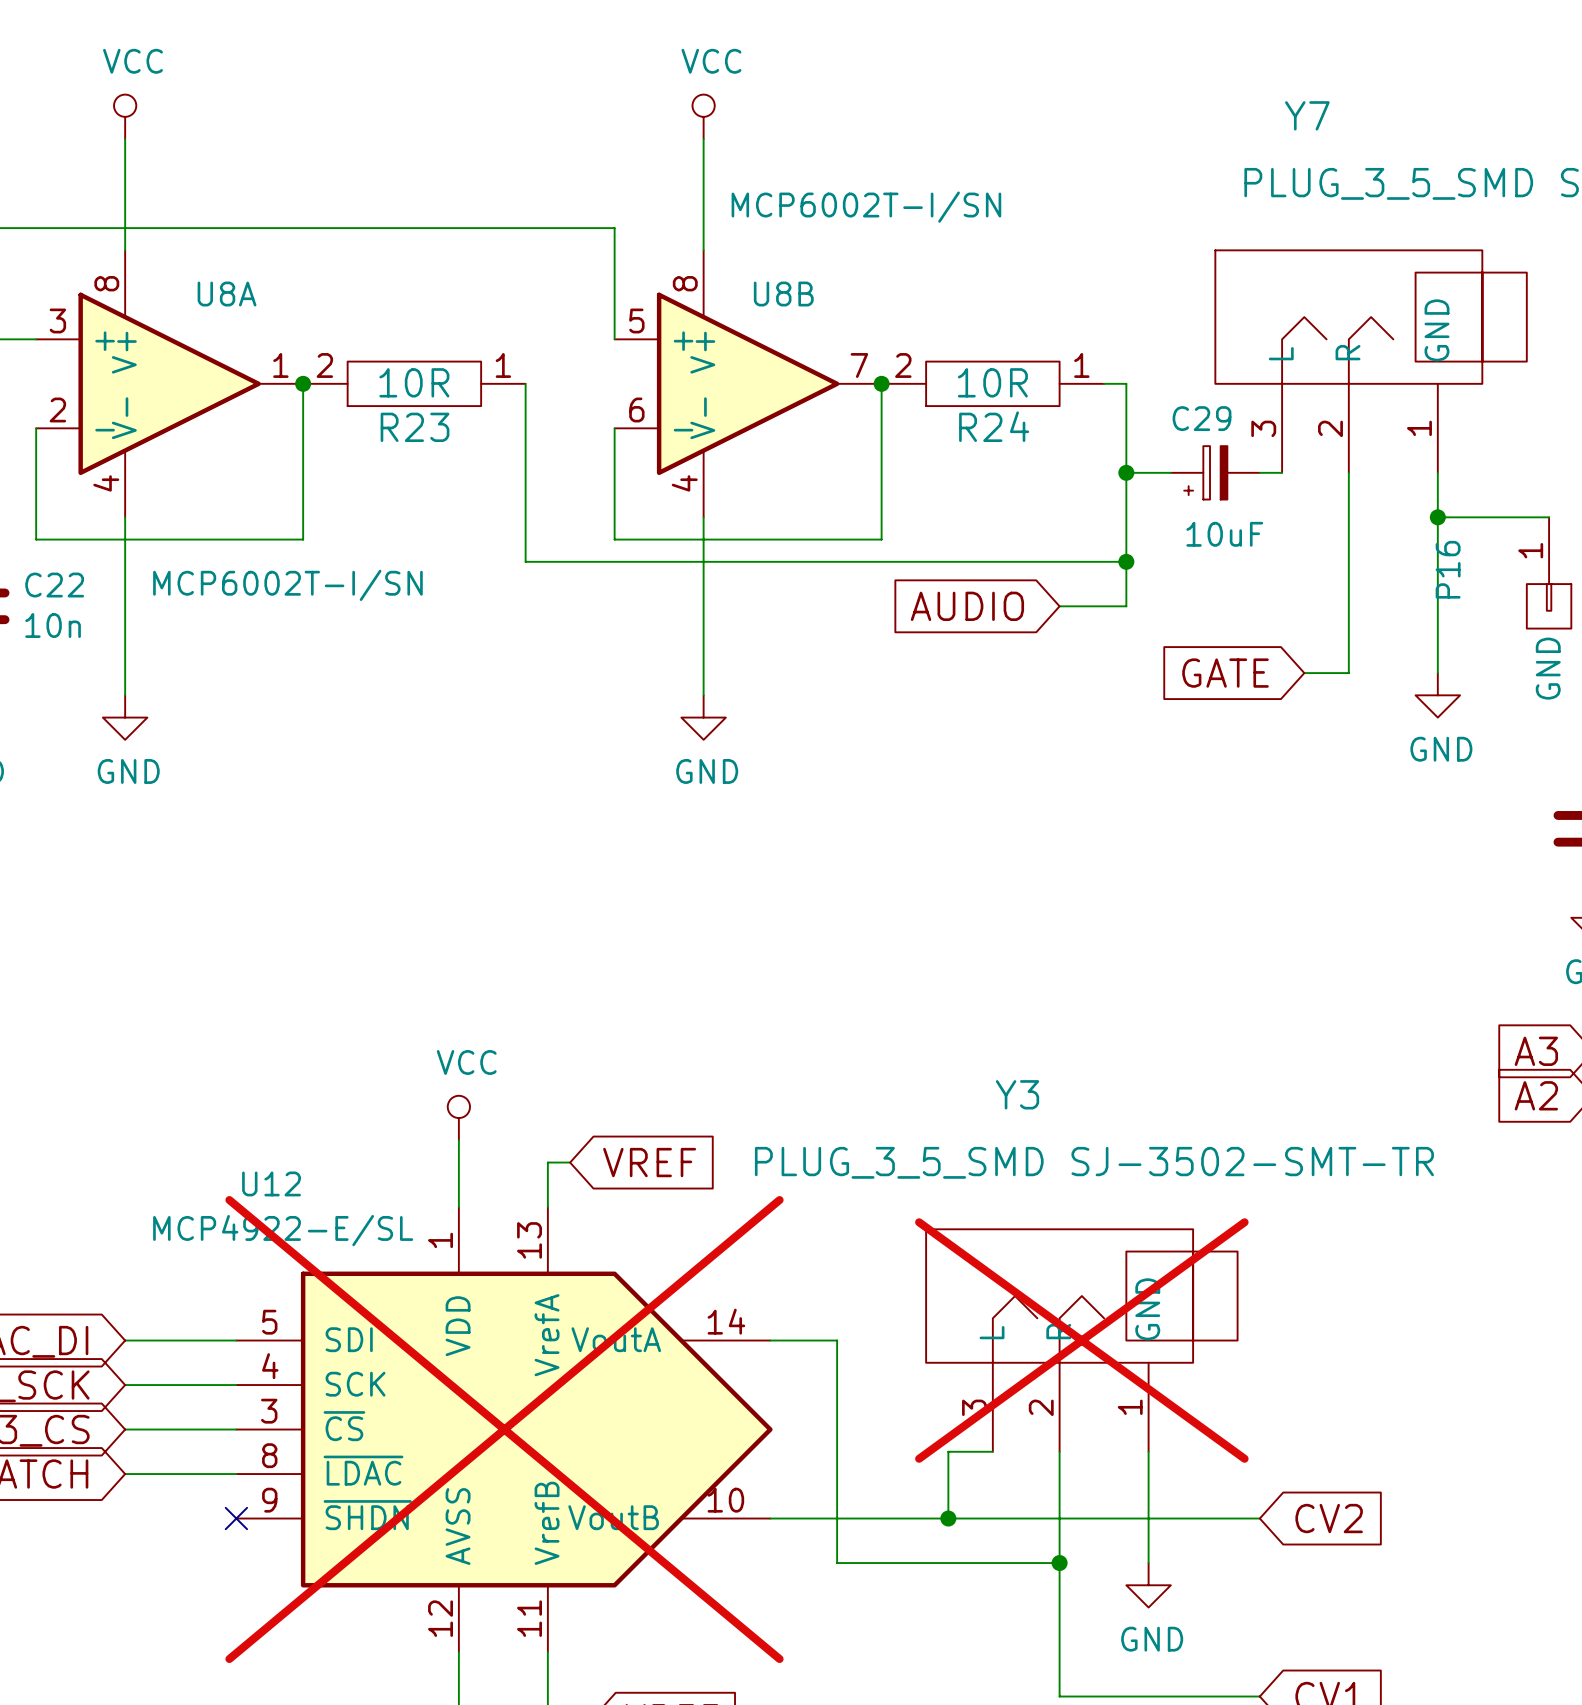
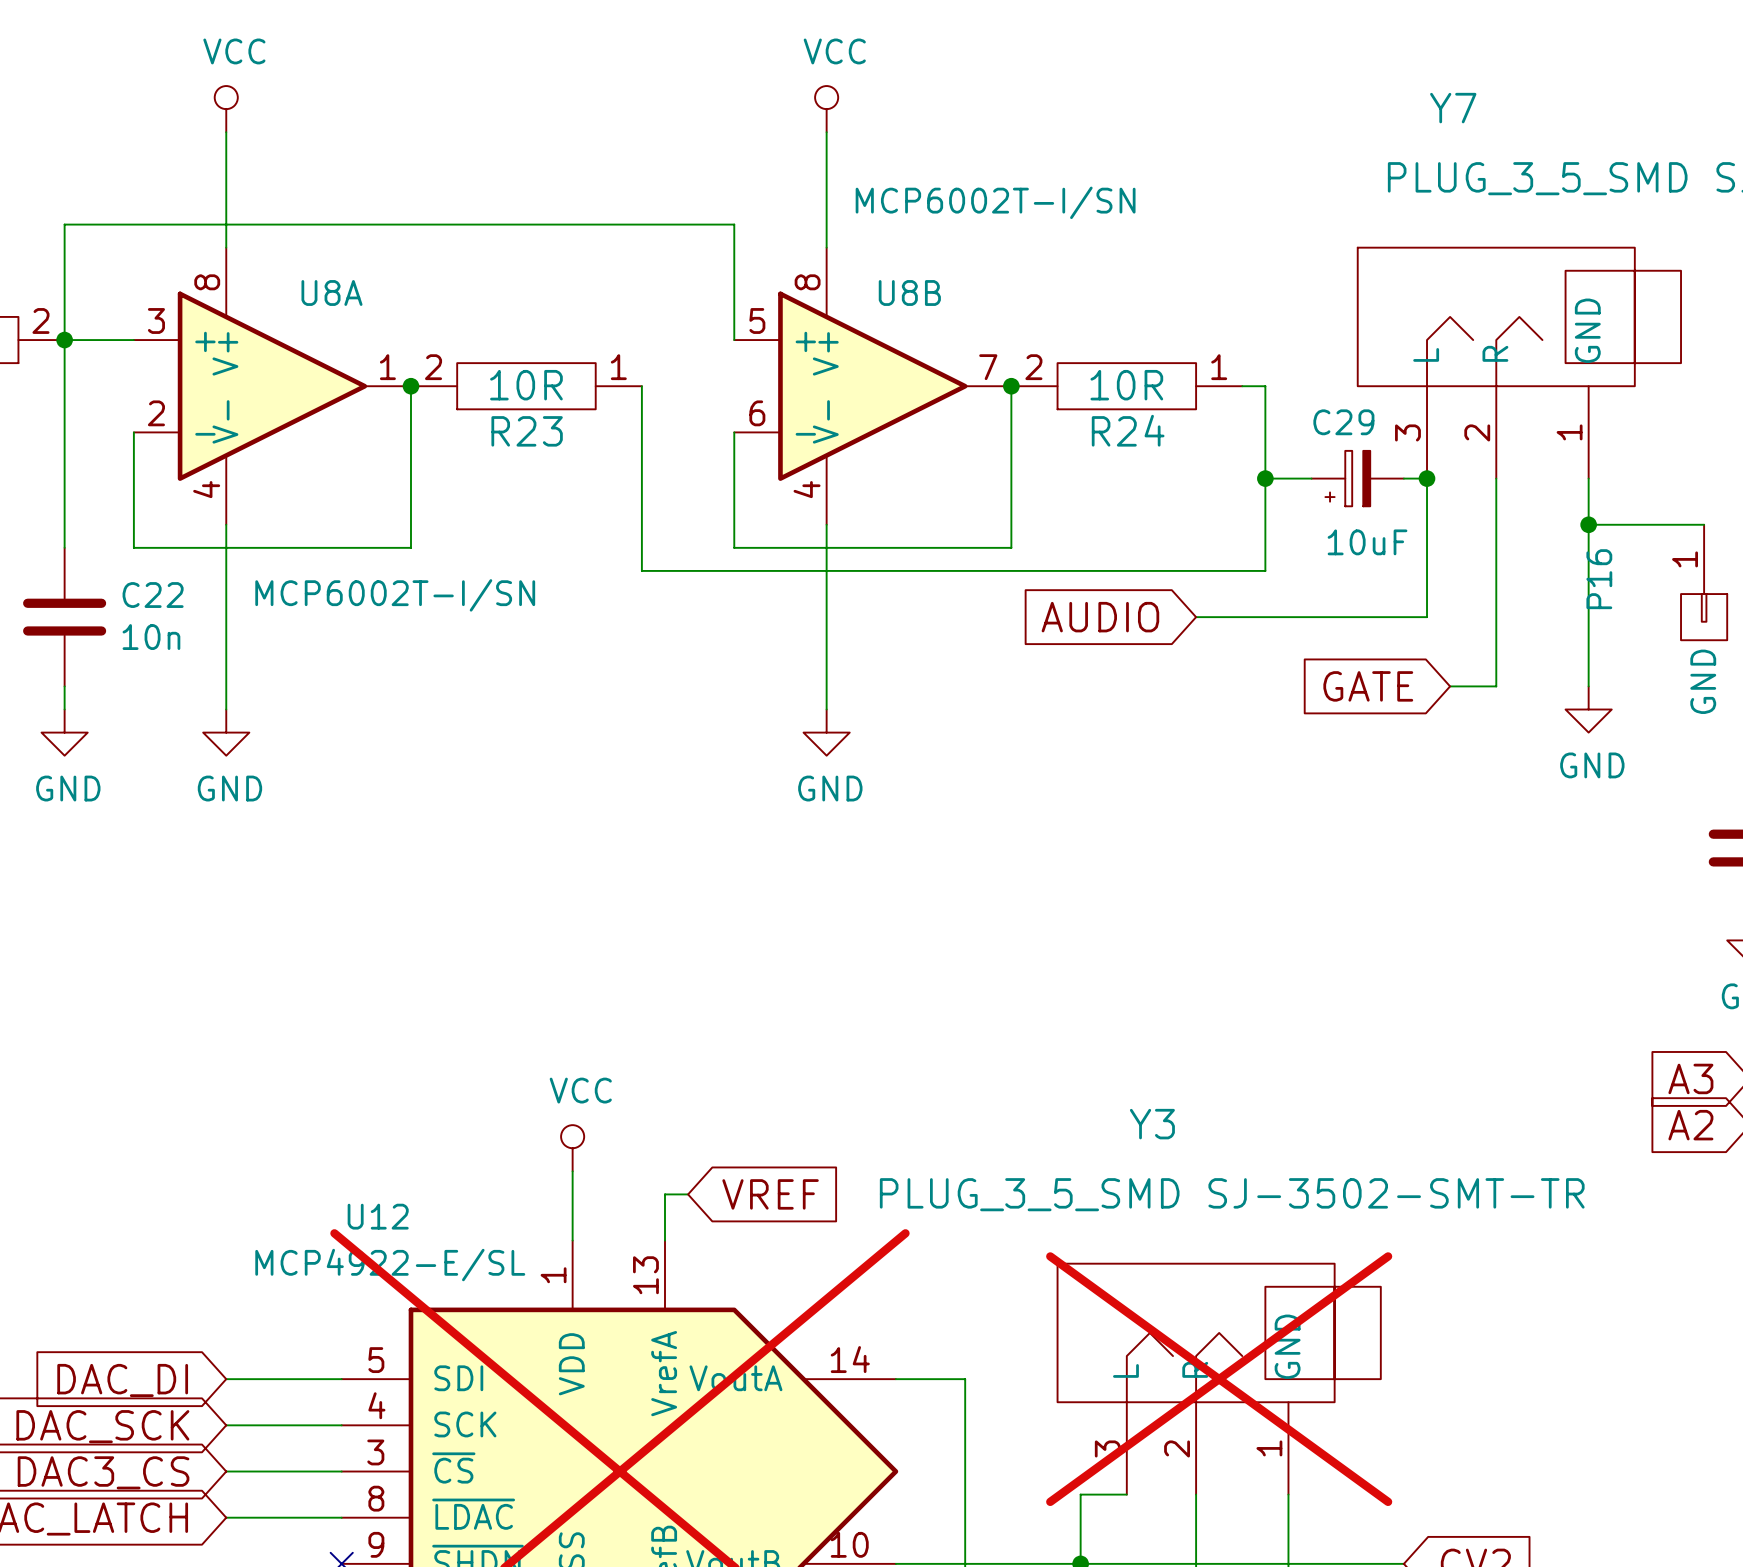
junction: none -> (1427, 478)
wire: (1126, 561) (1126, 606) -> (1427, 478) (1427, 617) (1265, 617)
junction: (1126, 561) -> none

